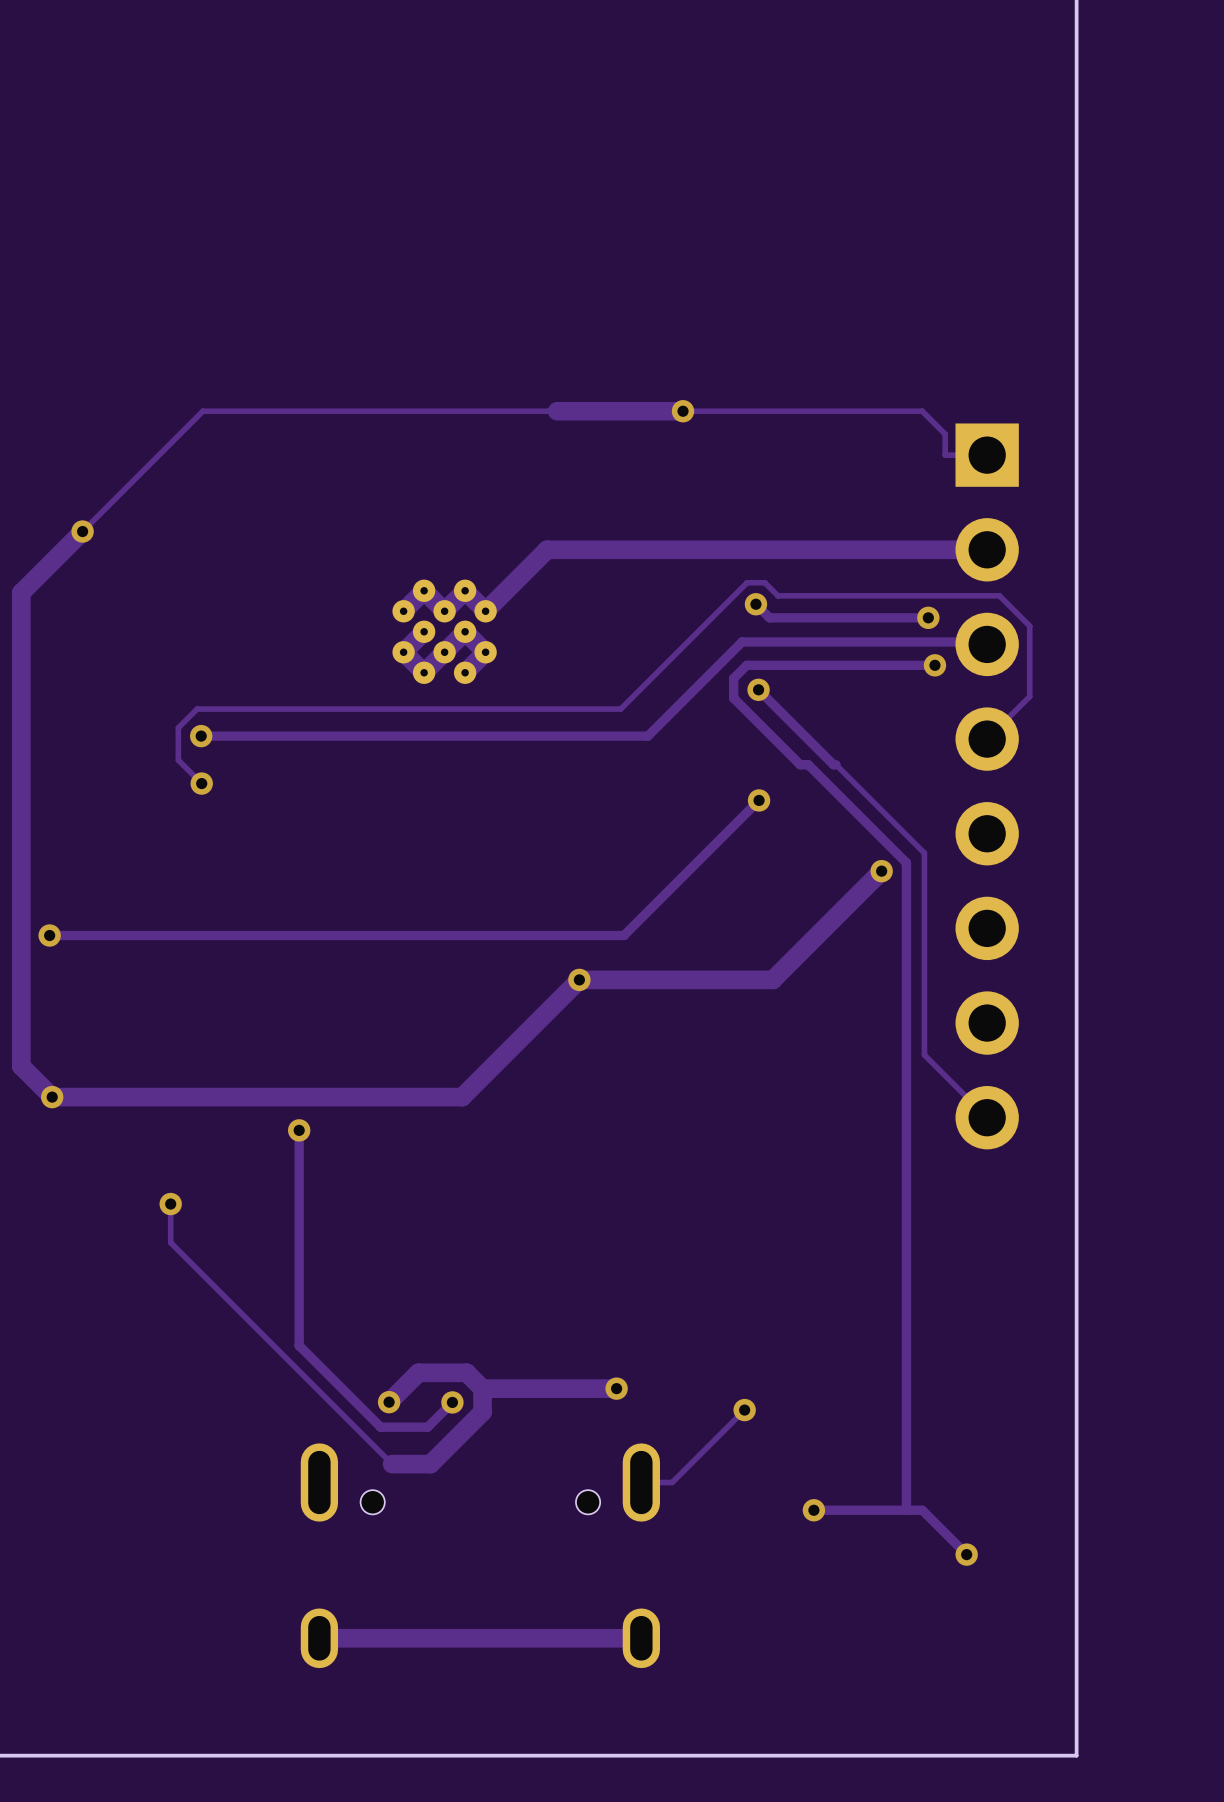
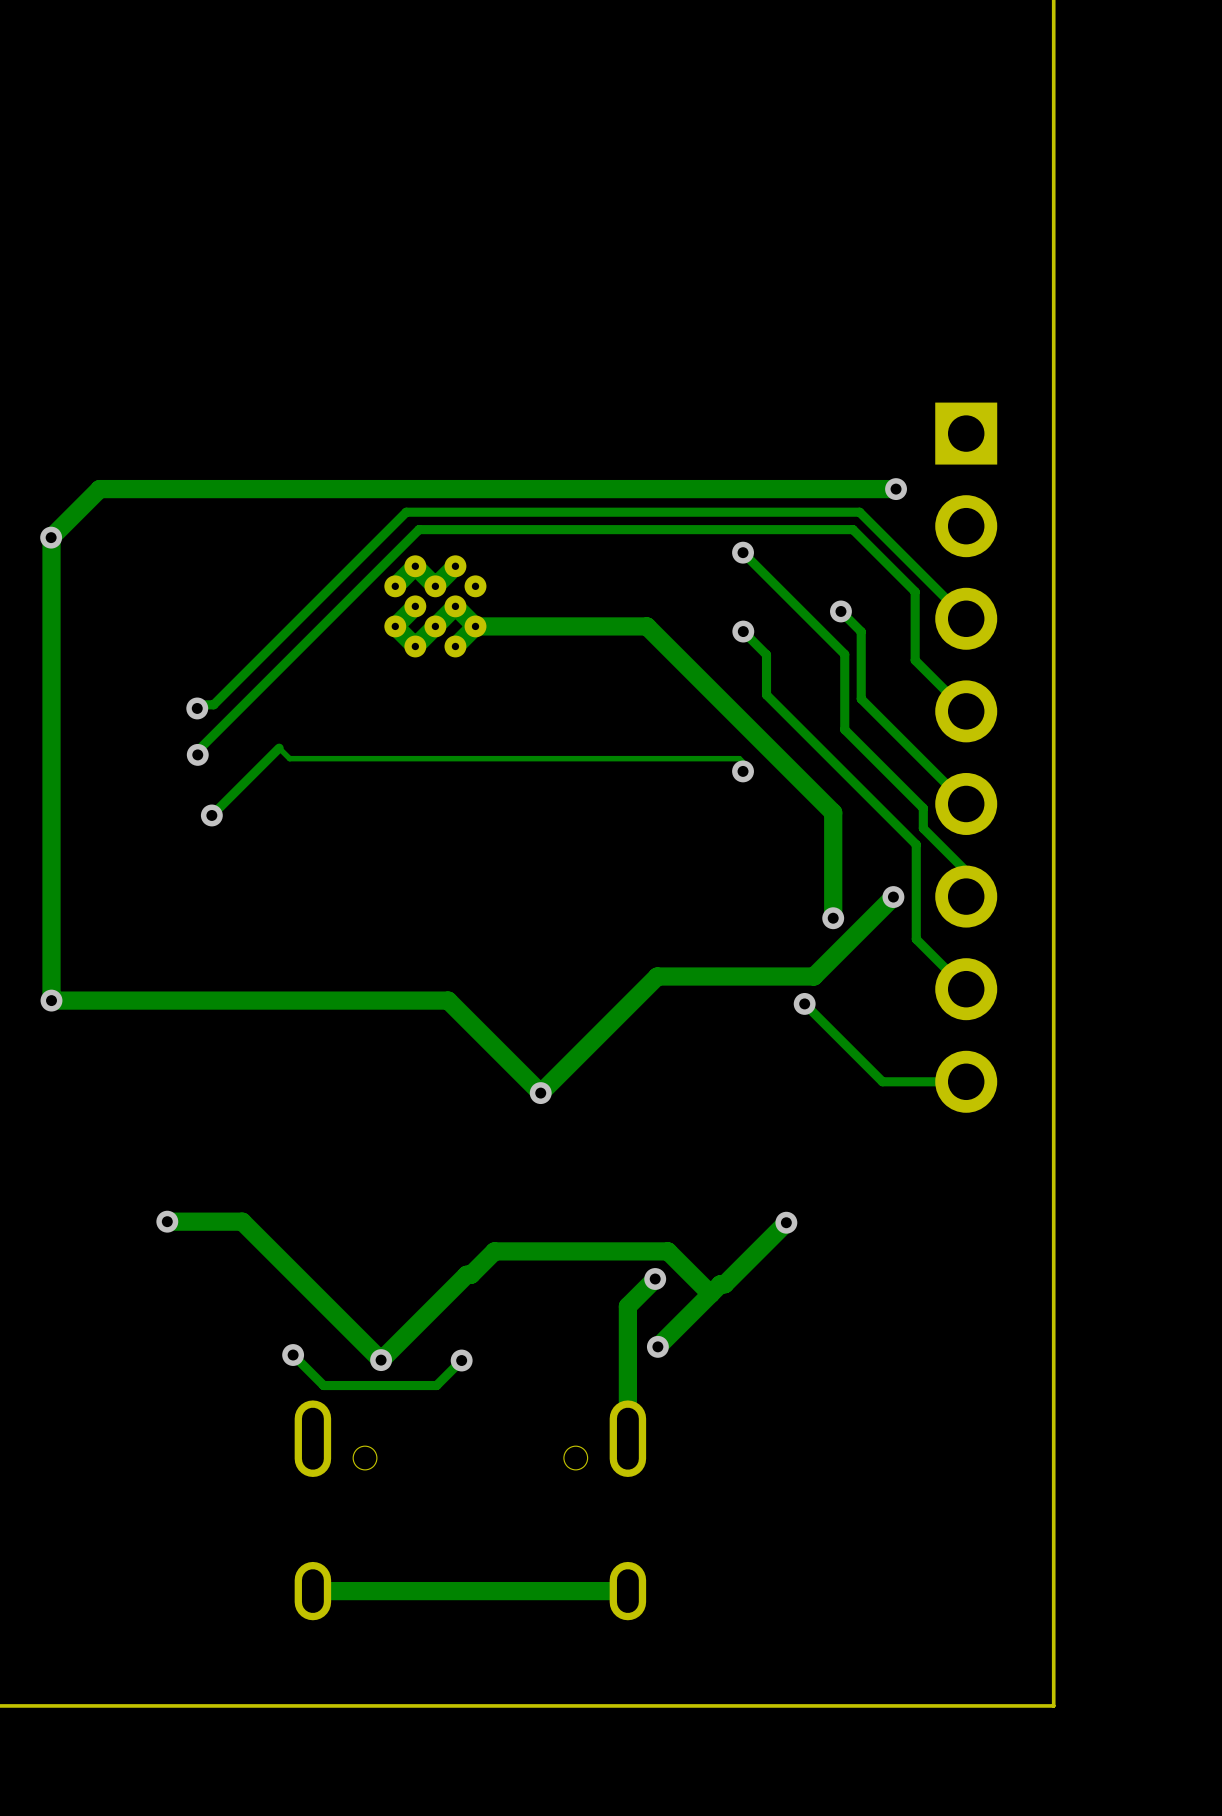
via: (683, 411) -> none
track: (987, 455) (945, 455) (945, 434) (922, 411) (202, 411) (21, 592) (21, 1066) (52, 1097) (462, 1097) (579, 979) (772, 979) (881, 871) -> none
track: none -> (896, 489) (99, 489) (51, 537)
via: none -> (896, 489)
via position: (82, 531) -> (51, 537)
track: (987, 549) (547, 549) (485, 611) (465, 590) -> none
track: none -> (51, 537) (51, 1000) (448, 1000) (540, 1093) (657, 976) (813, 976) (893, 897)
track: none -> (743, 552) (844, 654) (844, 729) (923, 808) (923, 828) (966, 871) (966, 896)
via: none -> (743, 552)
track: (764, 582) (747, 582) (620, 709) (197, 709) (178, 727) (178, 760) (201, 783) -> none
track: (777, 595) (999, 595) (1029, 626) (1029, 696) (987, 739) -> (197, 750) (419, 529) (852, 529) (915, 591) (915, 660) (966, 711)
track: (755, 604) (769, 617) (928, 617) -> none
via: (755, 604) -> none
via: (928, 617) -> none
track: none -> (840, 611) (861, 631) (861, 698) (966, 803)
via: none -> (840, 611)
track: (984, 641) (742, 641) (647, 736) (201, 736) -> (963, 616) (859, 512) (406, 512) (213, 704) (197, 704)
track: none -> (475, 626) (647, 626) (833, 812) (833, 918)
track: none -> (743, 631) (766, 654) (766, 694) (916, 844) (916, 939) (966, 989)
via: none -> (743, 631)
track: (934, 665) (746, 665) (733, 678) (733, 698) (800, 764) (808, 764) (906, 862) (906, 1510) -> none
via: (934, 665) -> none
track: (758, 689) (924, 853) (924, 1054) (987, 1117) -> (804, 1003) (882, 1081) (966, 1081)
via: (758, 689) -> none
track: none -> (742, 762) (739, 758) (289, 758) (279, 748) (211, 815)
track: (759, 800) (623, 935) (49, 935) -> none
via: none -> (211, 815)
via: (881, 871) -> none
via: none -> (893, 897)
via: (49, 935) -> none
via: none -> (833, 918)
via: (579, 979) -> none
via: none -> (51, 1000)
via: none -> (804, 1003)
via: (52, 1097) -> none
via: none -> (540, 1093)
track: (299, 1130) (299, 1345) (380, 1427) (427, 1427) (452, 1402) -> none
via: (299, 1130) -> none
track: (170, 1204) (170, 1242) (392, 1464) (430, 1464) (482, 1412) (482, 1388) -> none
via position: (170, 1204) -> (167, 1221)
track: none -> (167, 1221) (242, 1221) (381, 1360) (466, 1274) (471, 1274) (494, 1251) (668, 1251) (710, 1294)
track: none -> (786, 1222) (724, 1284) (720, 1284) (710, 1294)
via: none -> (786, 1222)
via: none -> (655, 1279)
track: none -> (710, 1294) (657, 1346)
track: (482, 1388) (466, 1372) (418, 1372) (389, 1402) -> none
track: (616, 1388) (482, 1388) -> none
via: (616, 1388) -> none
via: none -> (657, 1346)
track: none -> (293, 1355) (323, 1385) (436, 1385) (461, 1360)
via: none -> (293, 1355)
via position: (452, 1402) -> (461, 1360)
track: (744, 1410) (672, 1482) (641, 1482) -> (655, 1279) (627, 1306) (627, 1438)
via: (744, 1410) -> none
track: (813, 1510) (922, 1510) (966, 1554) -> none
via: (813, 1510) -> none
via: (966, 1554) -> none

